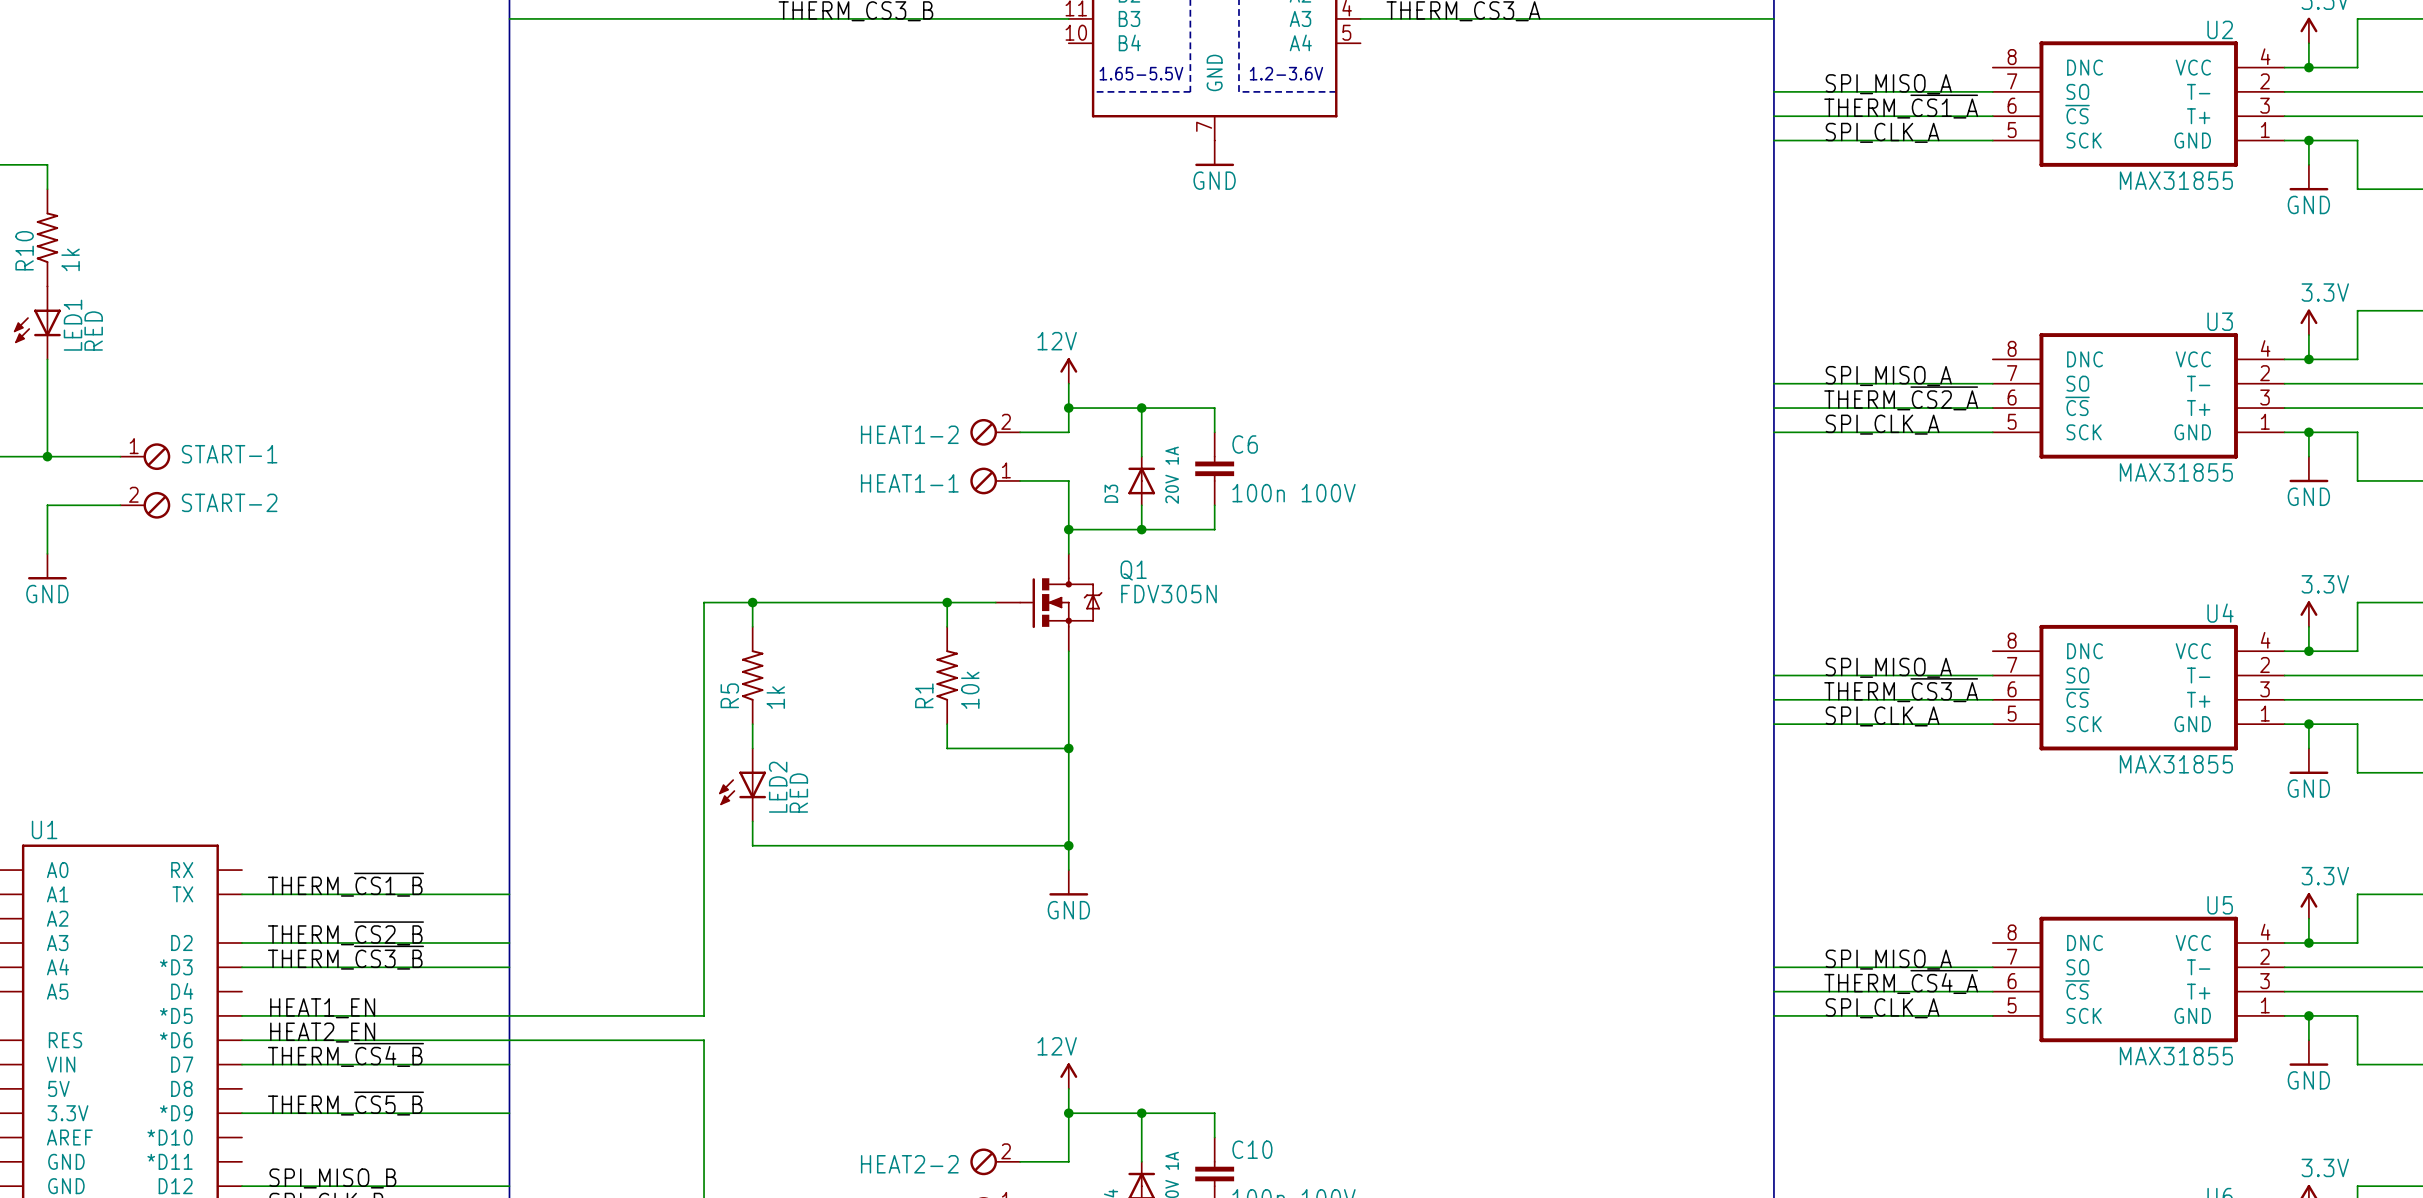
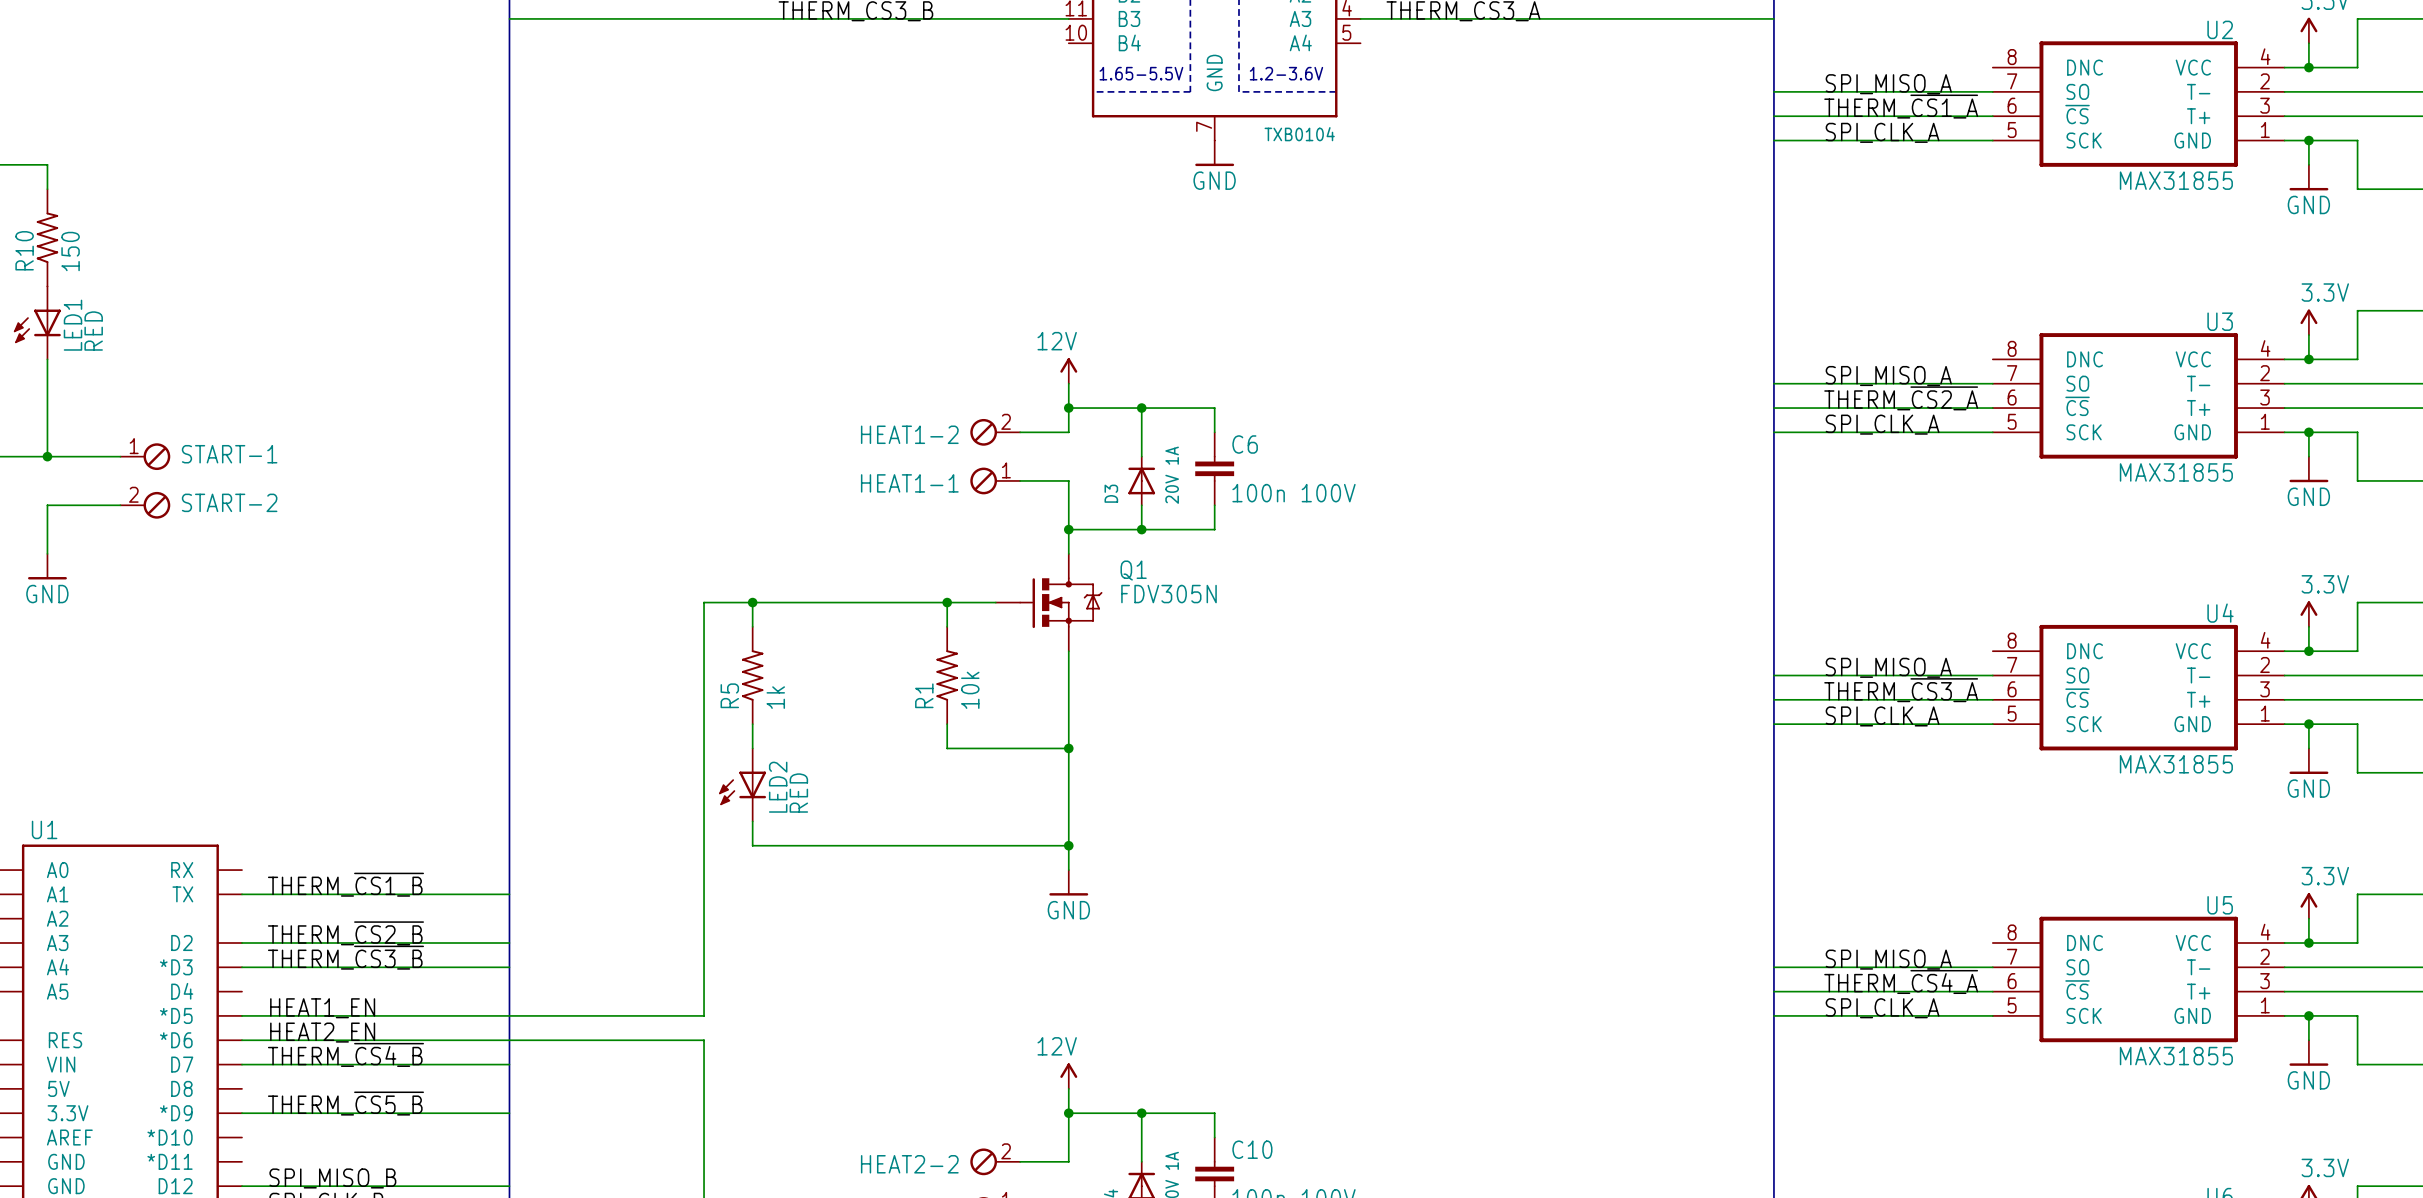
part value: none -> TXB0104 (1299, 134)
R10 value: 1k (70, 259) -> 150 (70, 251)

